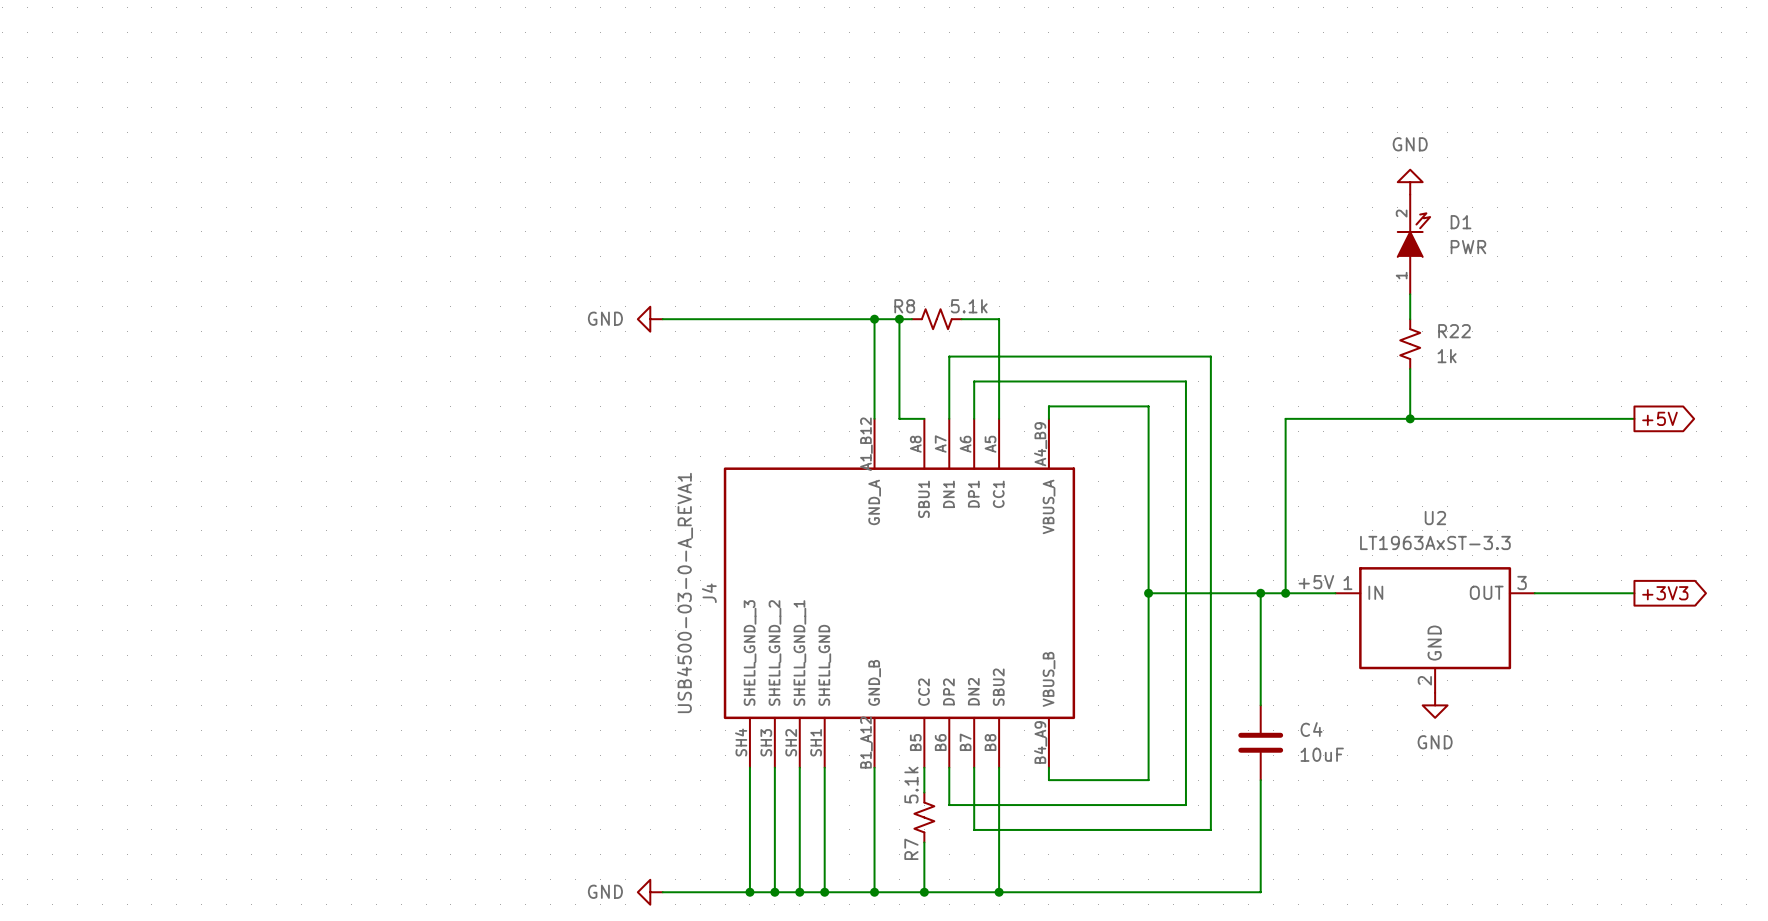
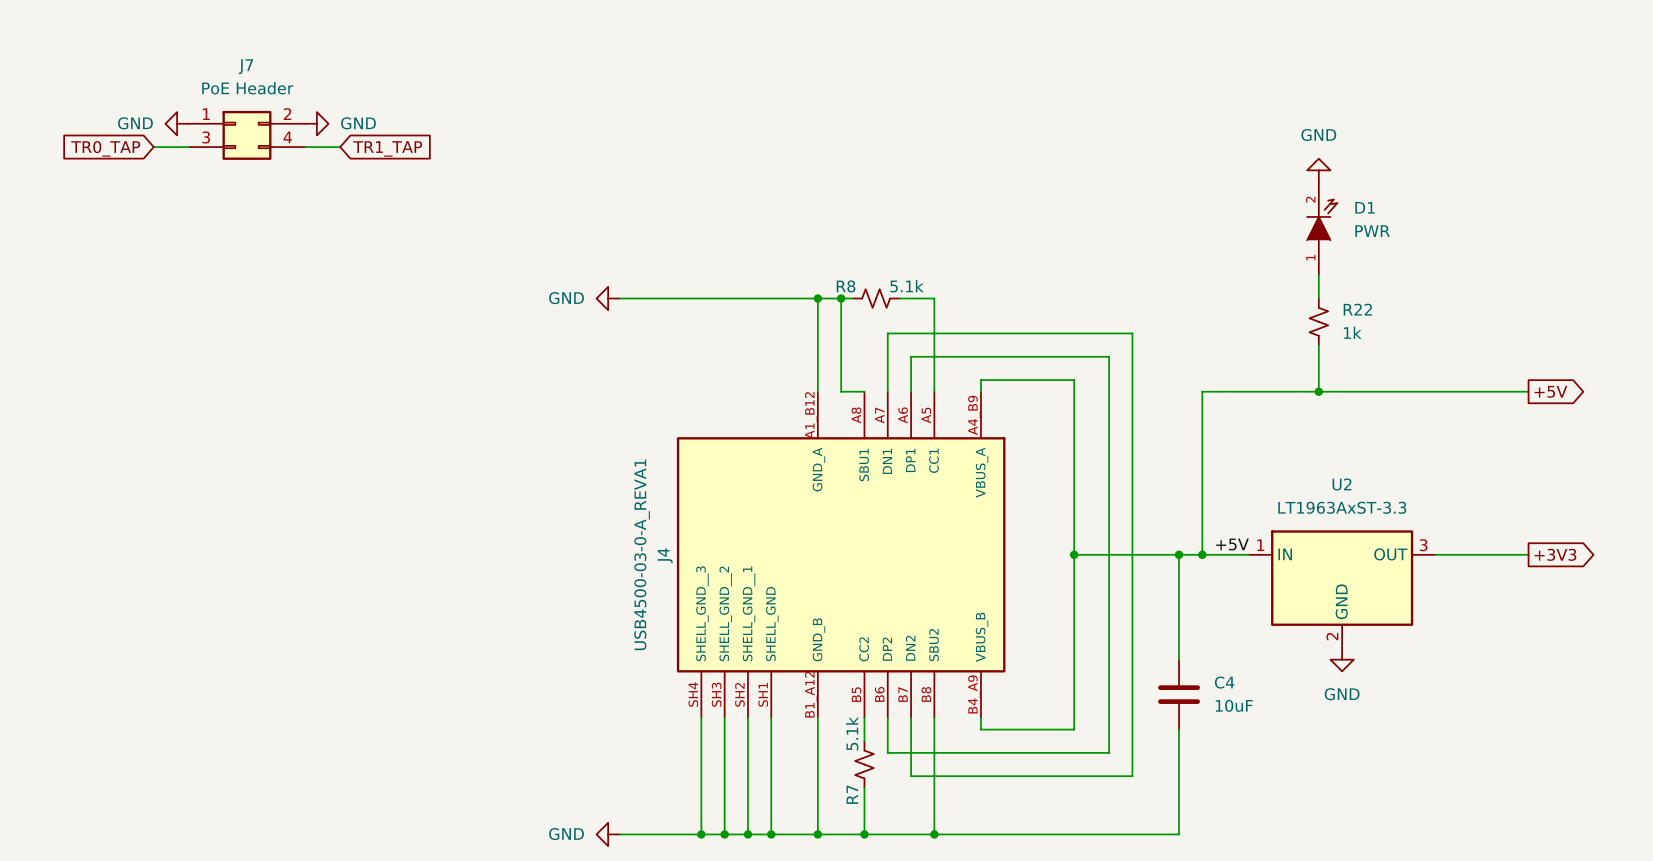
power symbol: none -> GND (177, 123)
power symbol: none -> GND (316, 123)
J7: none -> PoE Header (246, 135)
global label: none -> TR0_TAP (105, 148)
wire: none -> (153, 147) (188, 147)
wire: none -> (305, 147) (340, 147)
global label: none -> TR1_TAP (387, 148)

